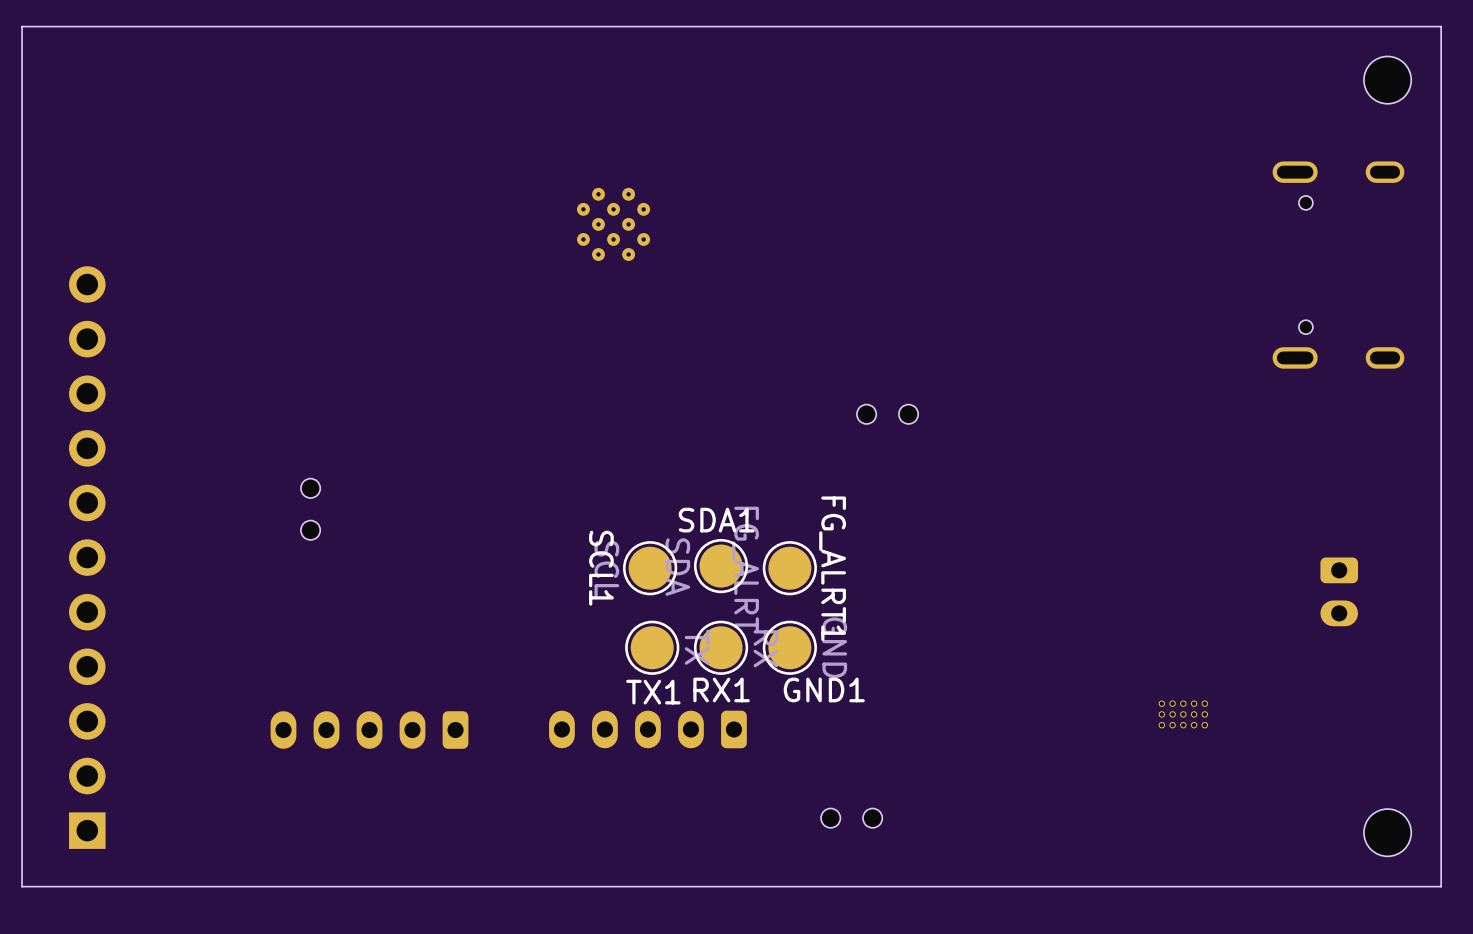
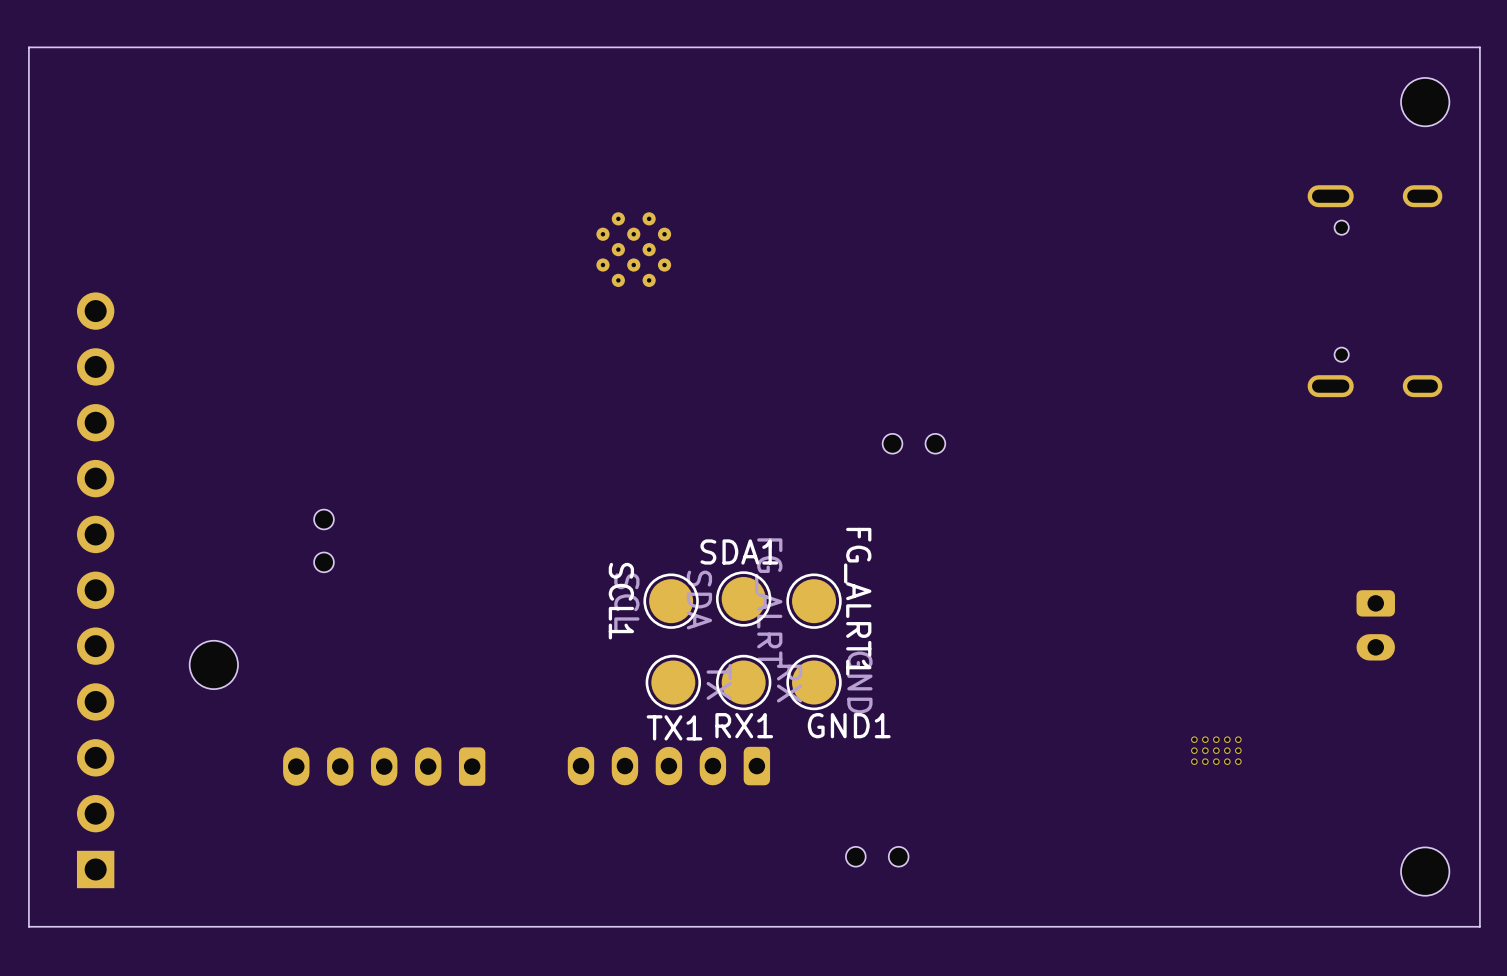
part: none -> (213, 664)

